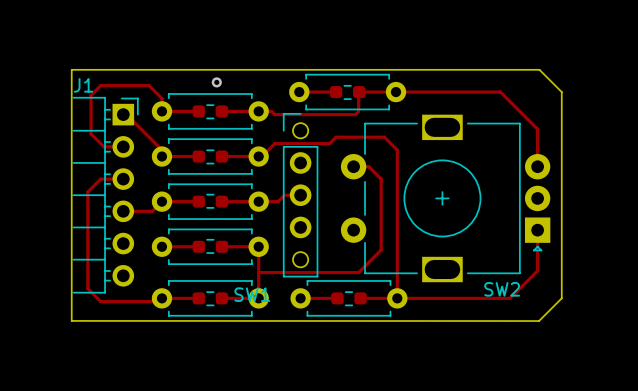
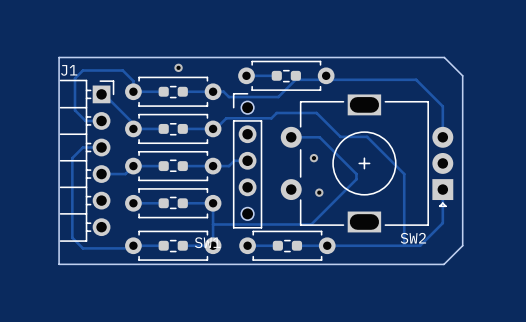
track: (358, 92) (358, 111) (355, 114) (274, 114) -> none
track: (359, 92) (500, 92) (505, 96) -> (226, 94) (229, 97) (278, 97) (295, 79) (416, 79)
track: (397, 150) (397, 298) -> (327, 123) (340, 136) (367, 136) (404, 174) (404, 245)
track: (368, 166) (381, 179) (381, 250) (358, 272) -> (303, 137) (319, 137) (356, 174) (356, 179) (311, 224) (295, 224)
via: none -> (313, 158)
via: none -> (319, 192)

